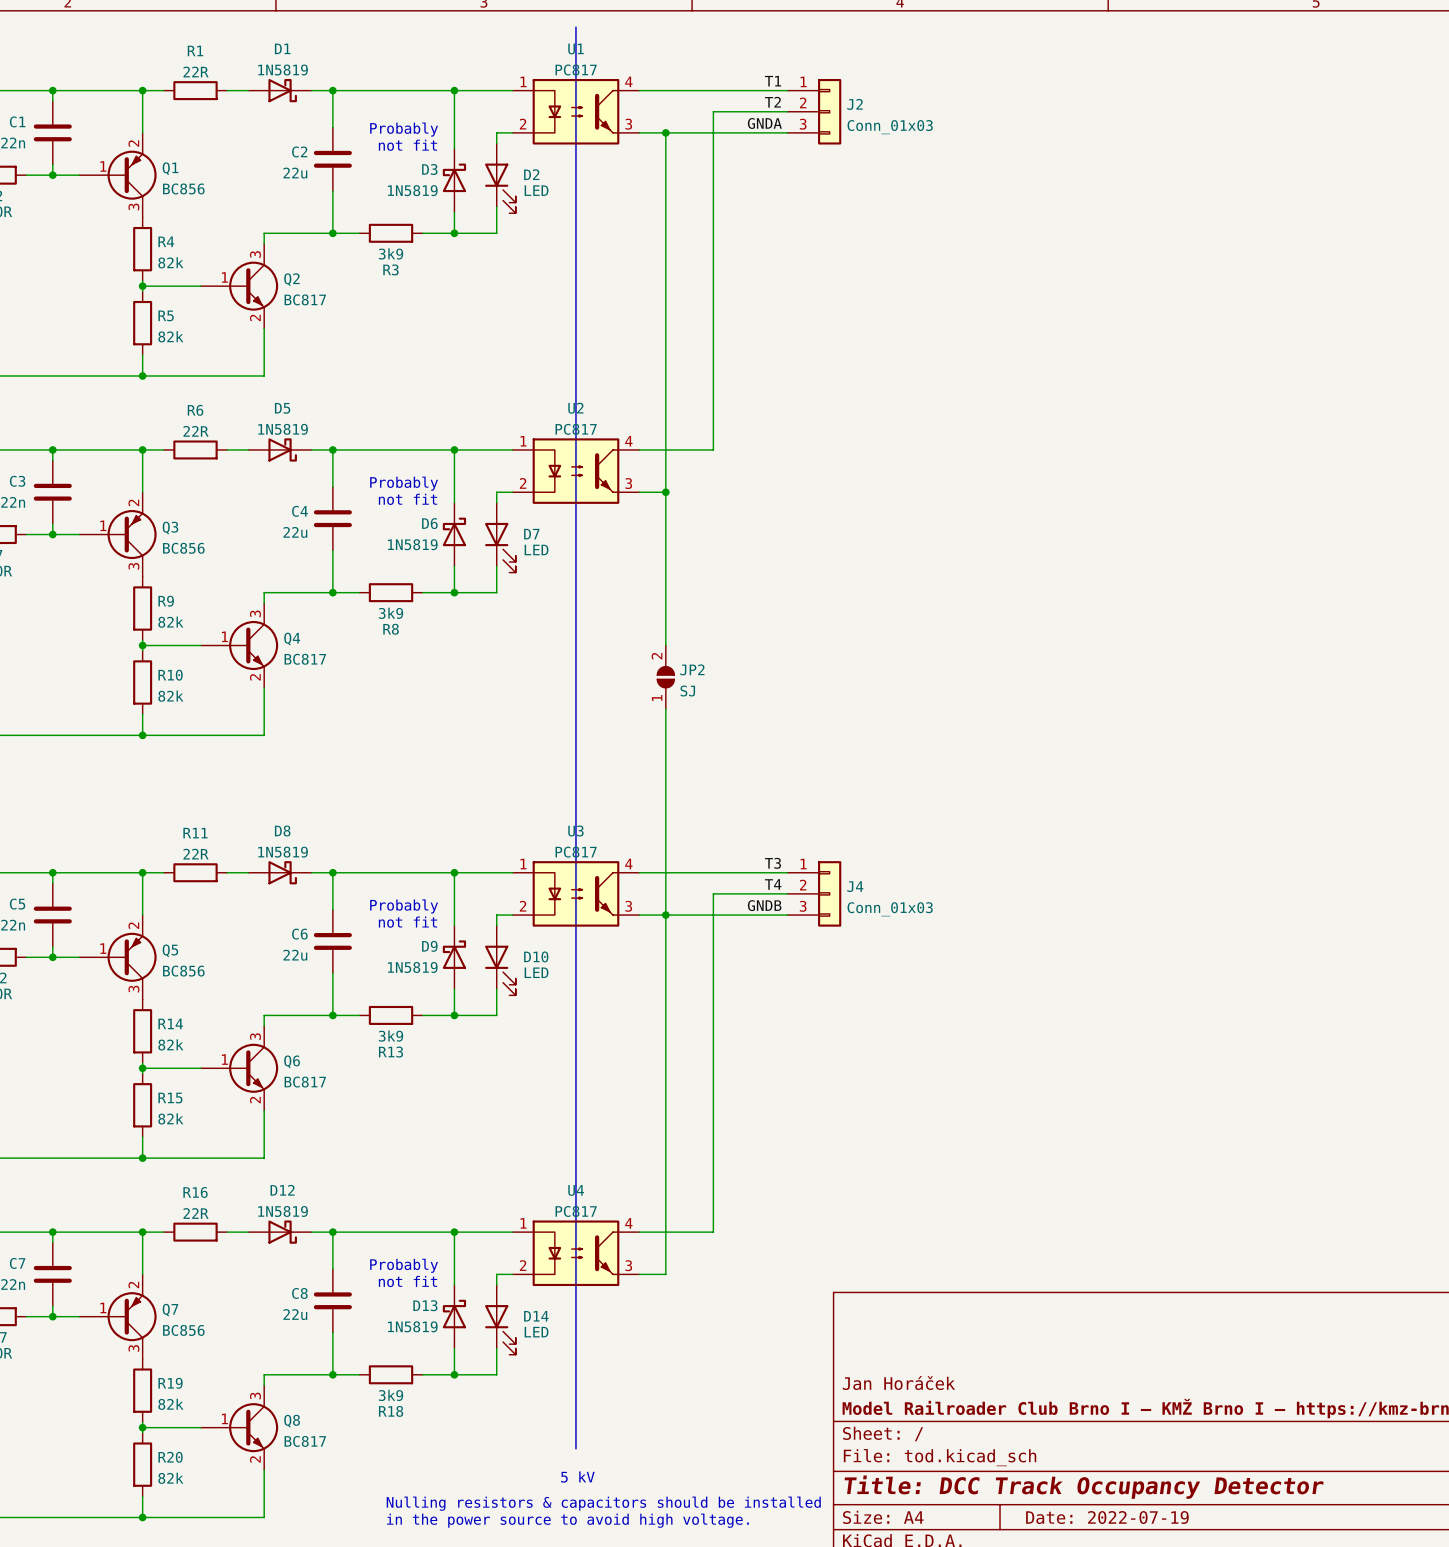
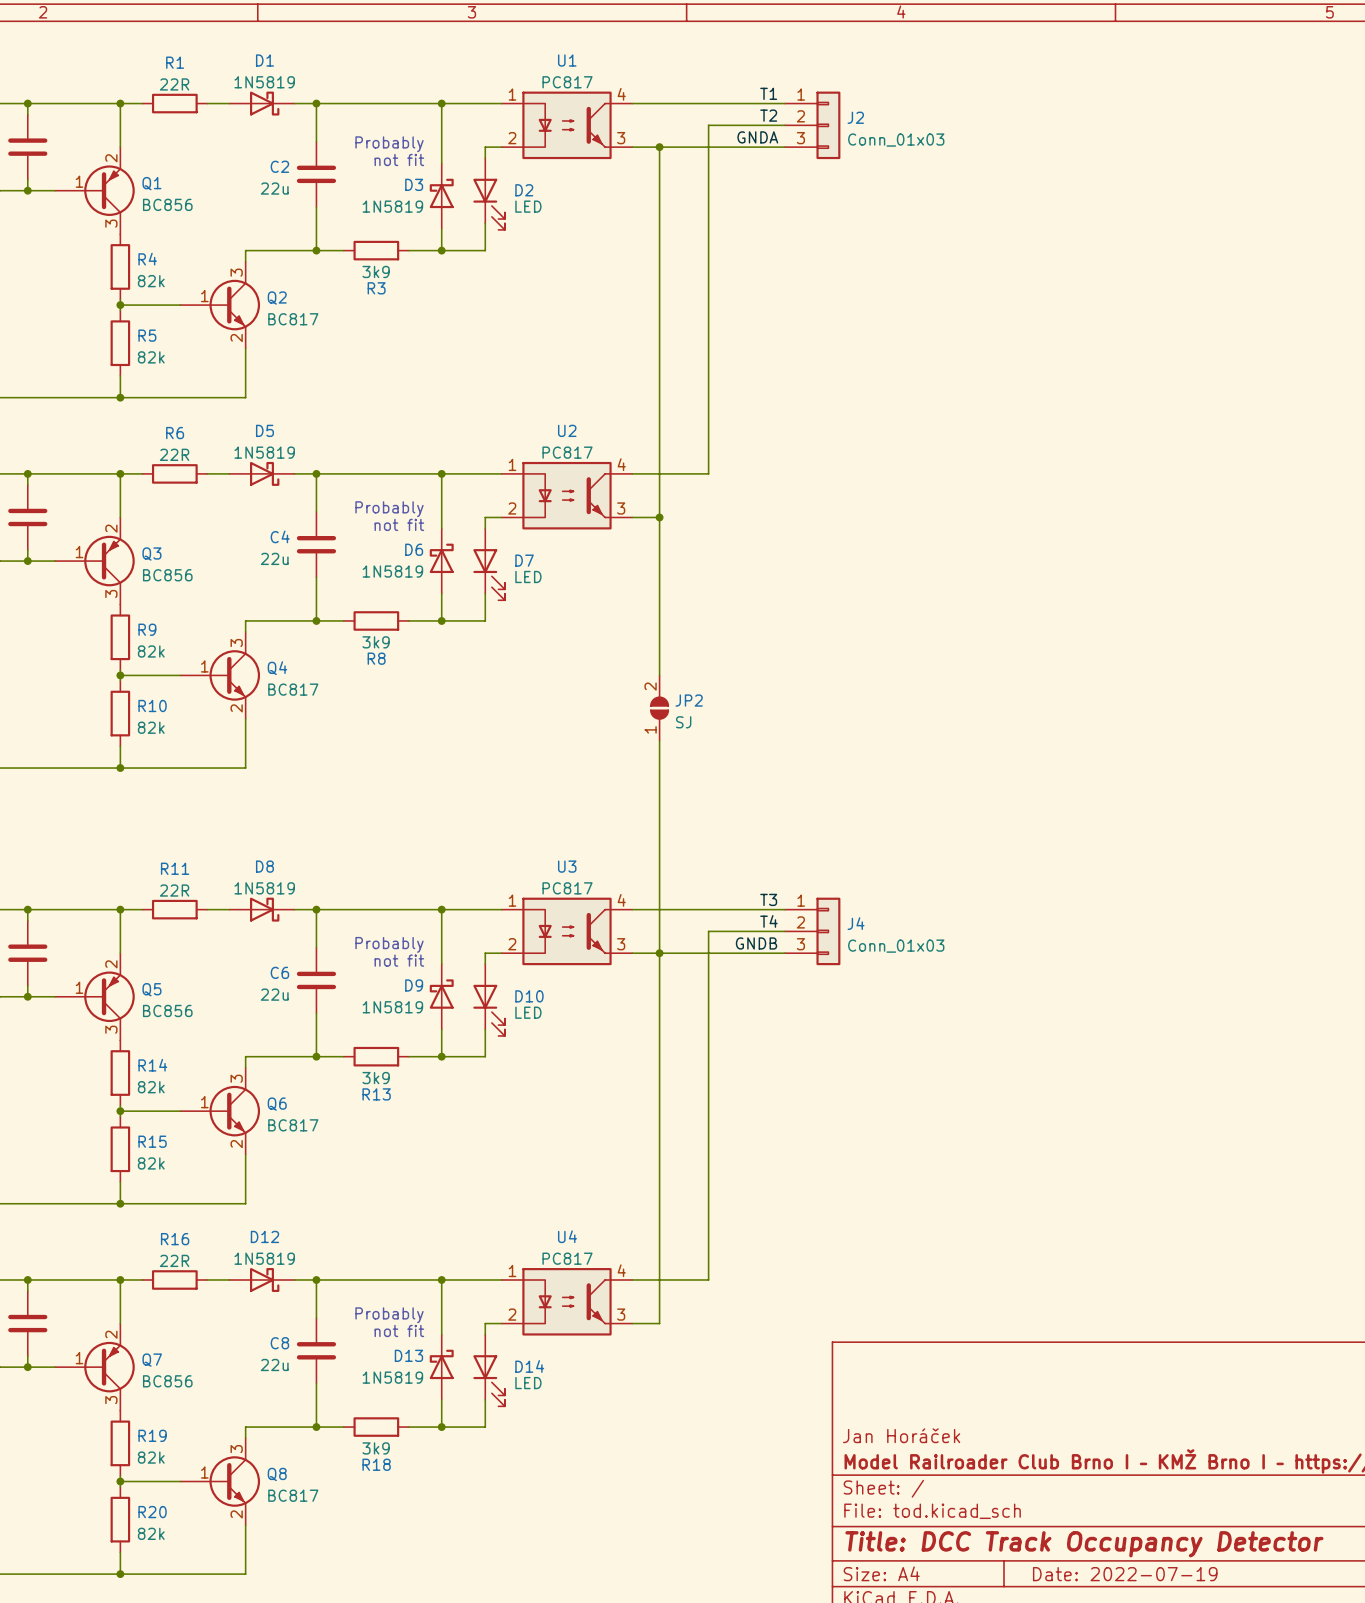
line: (575, 27) (575, 1448) -> none
text: 5 kV (577, 1477) -> none
text: Nulling resistors & capacitors should be installed (603, 1503) -> none
text: in the power source to avoid high voltage. (567, 1520) -> none

